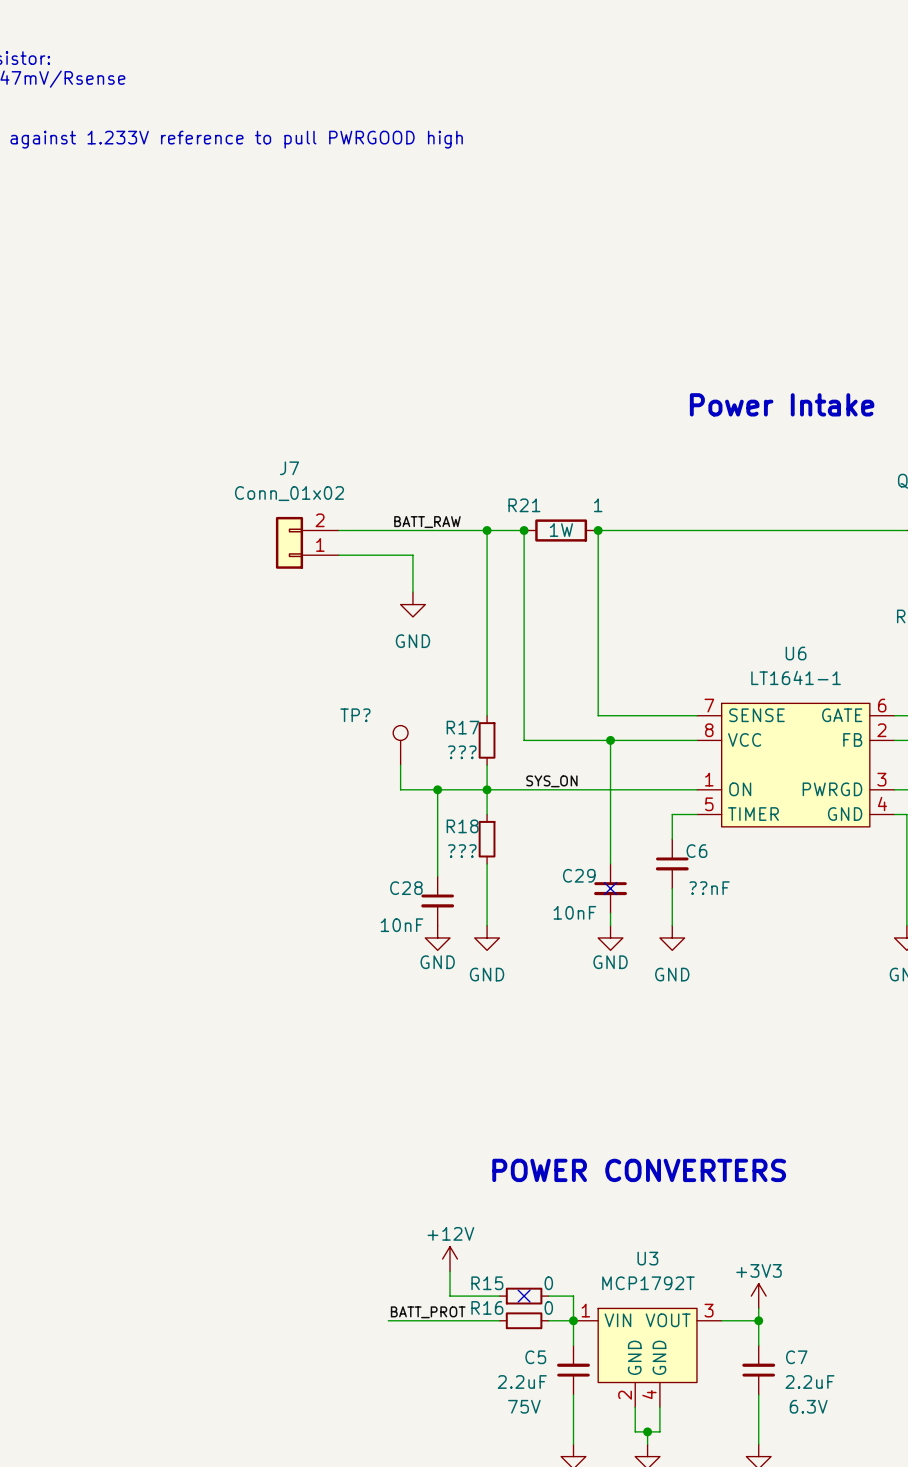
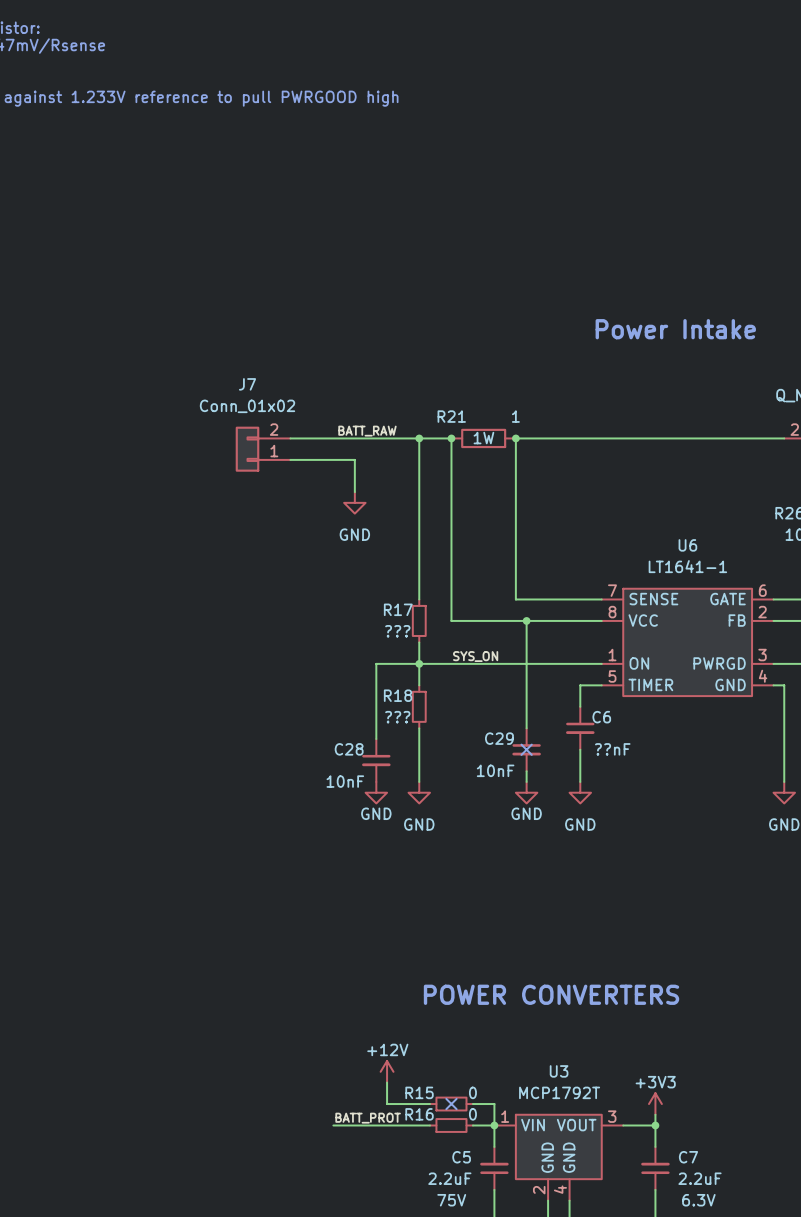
TP?: (400, 745) -> none
wire: (400, 765) (400, 789) (437, 789) -> none
junction: (437, 789) -> none

